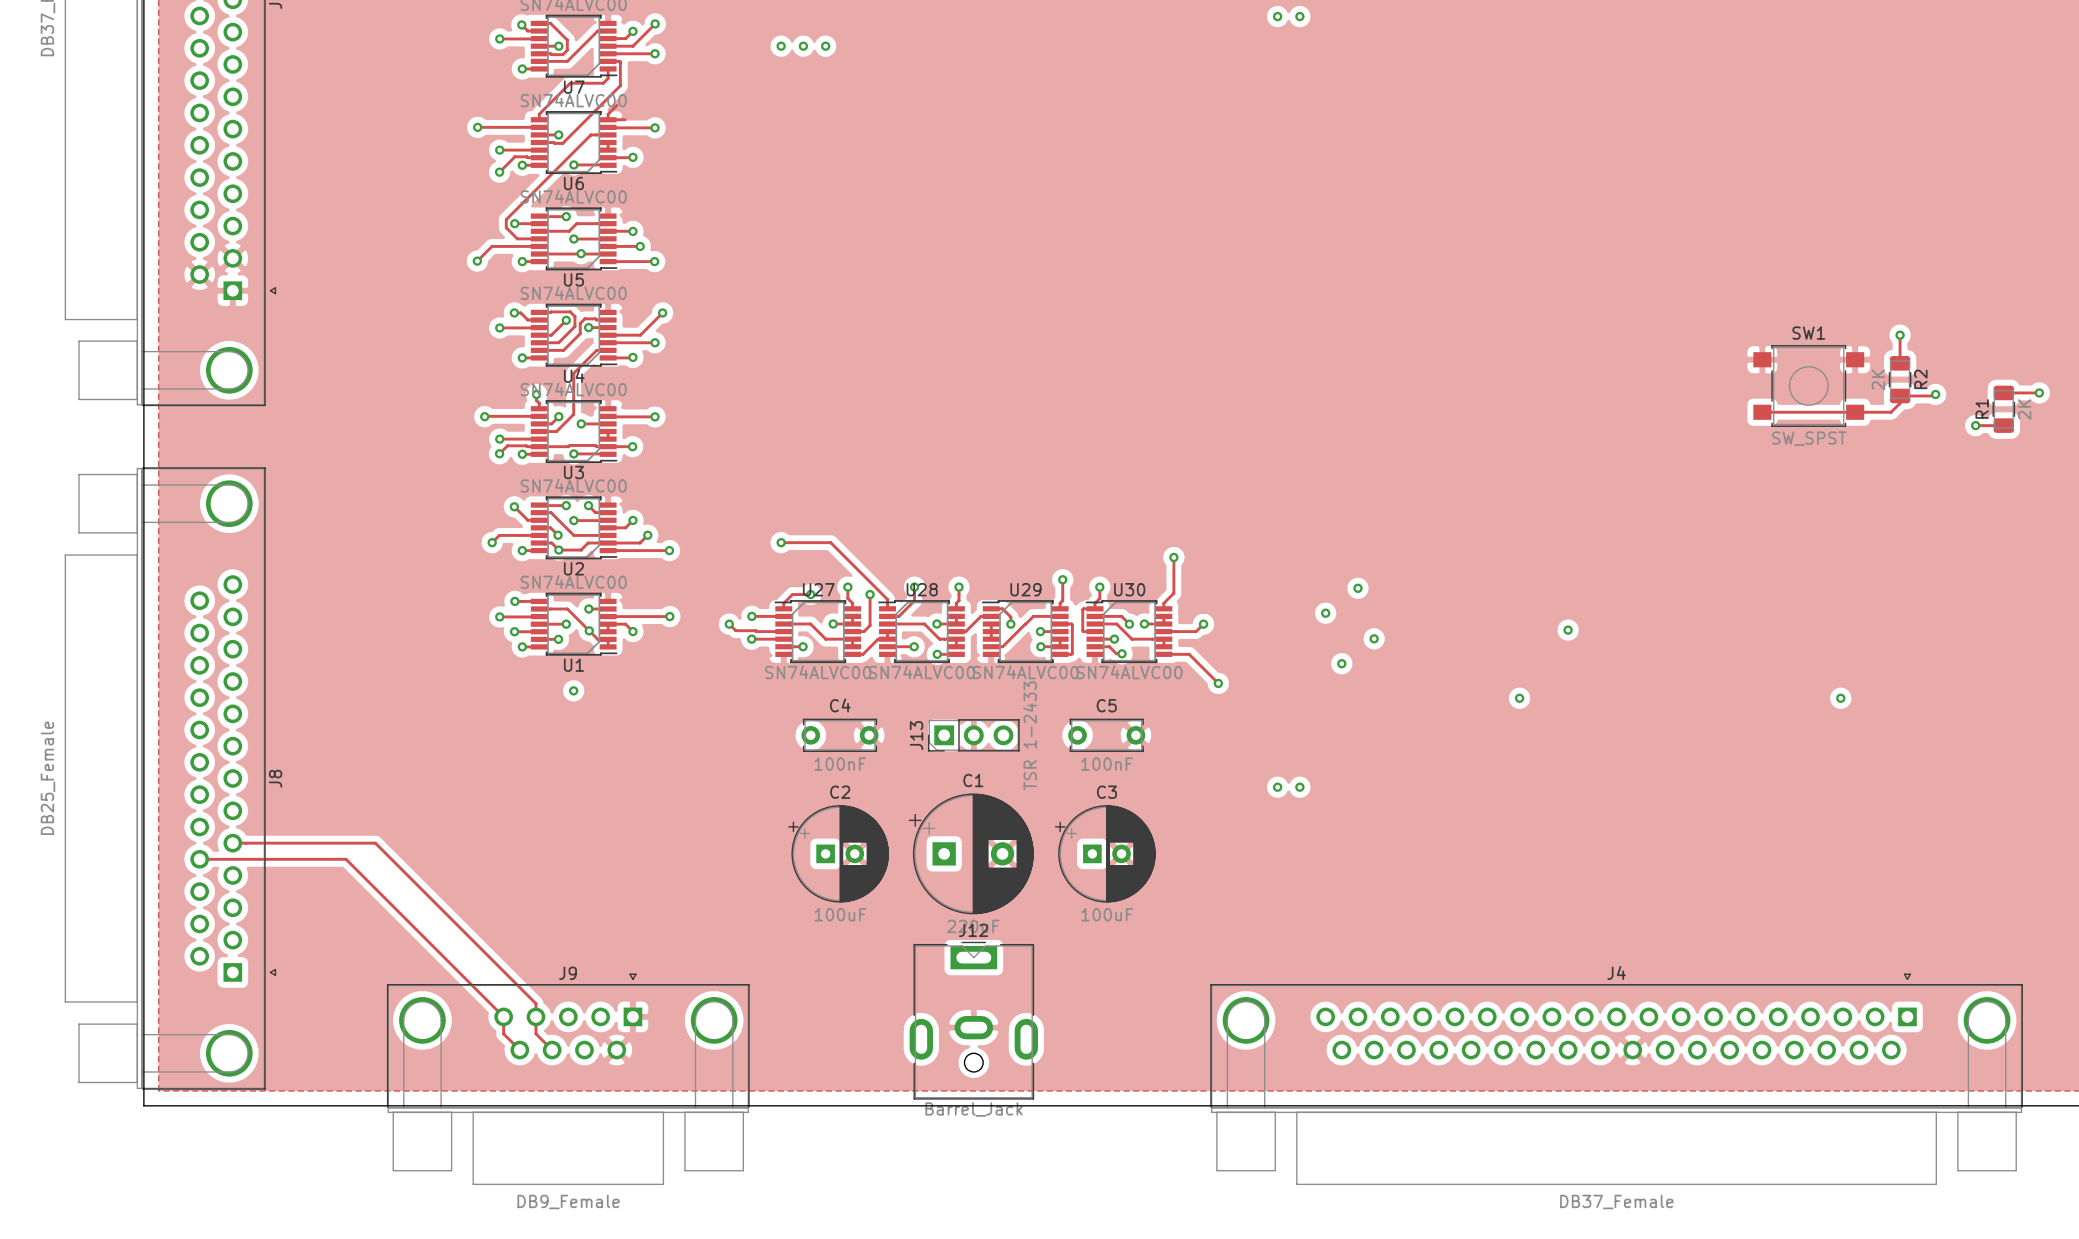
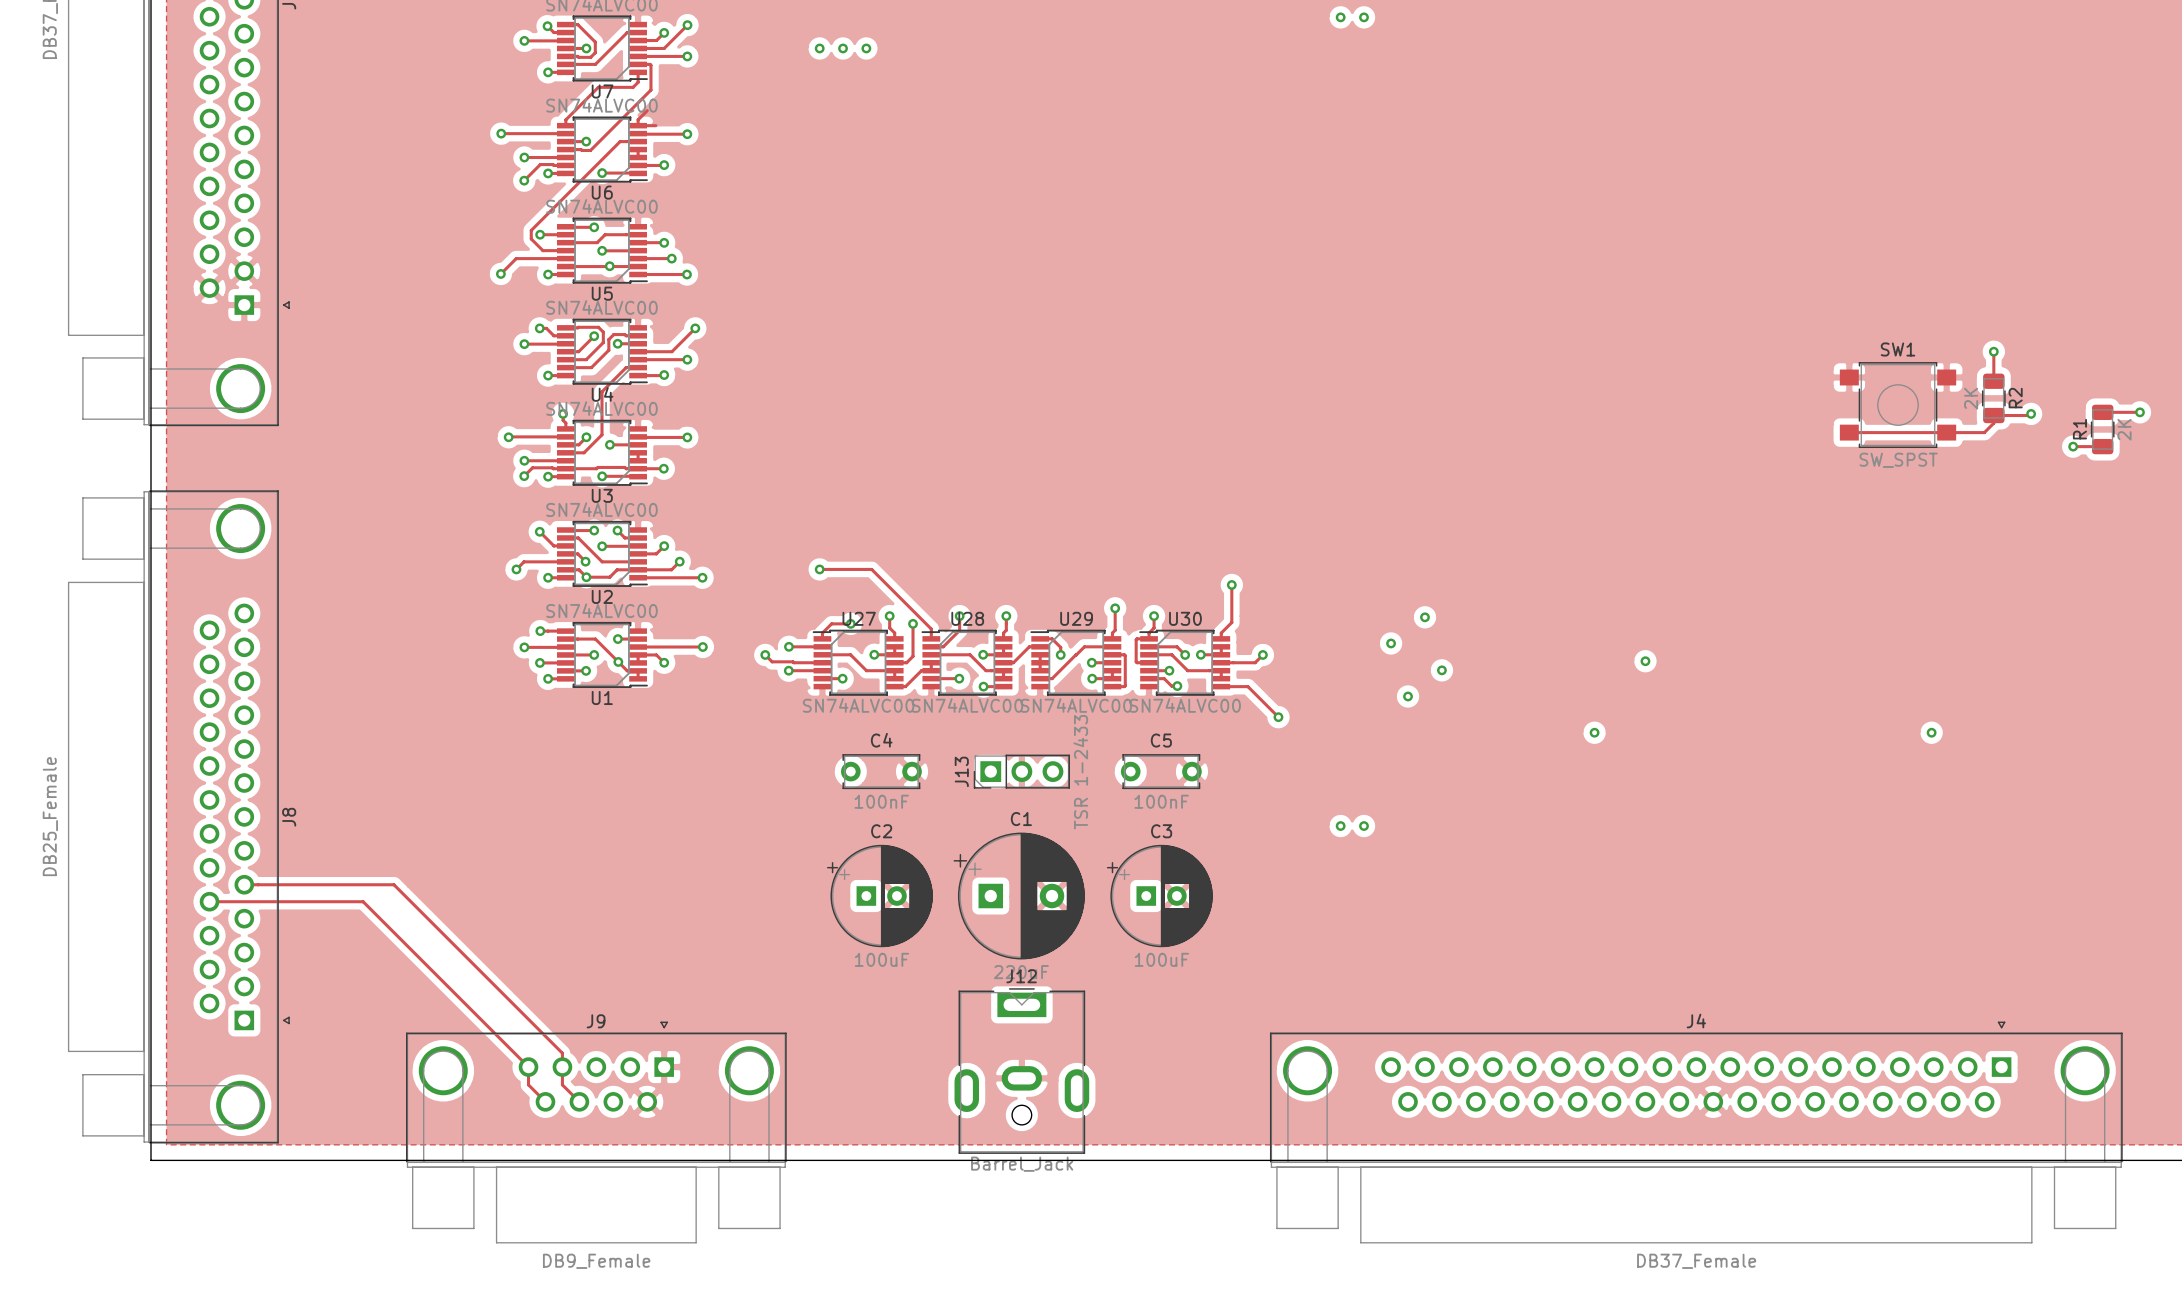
via: (573, 690) -> none

